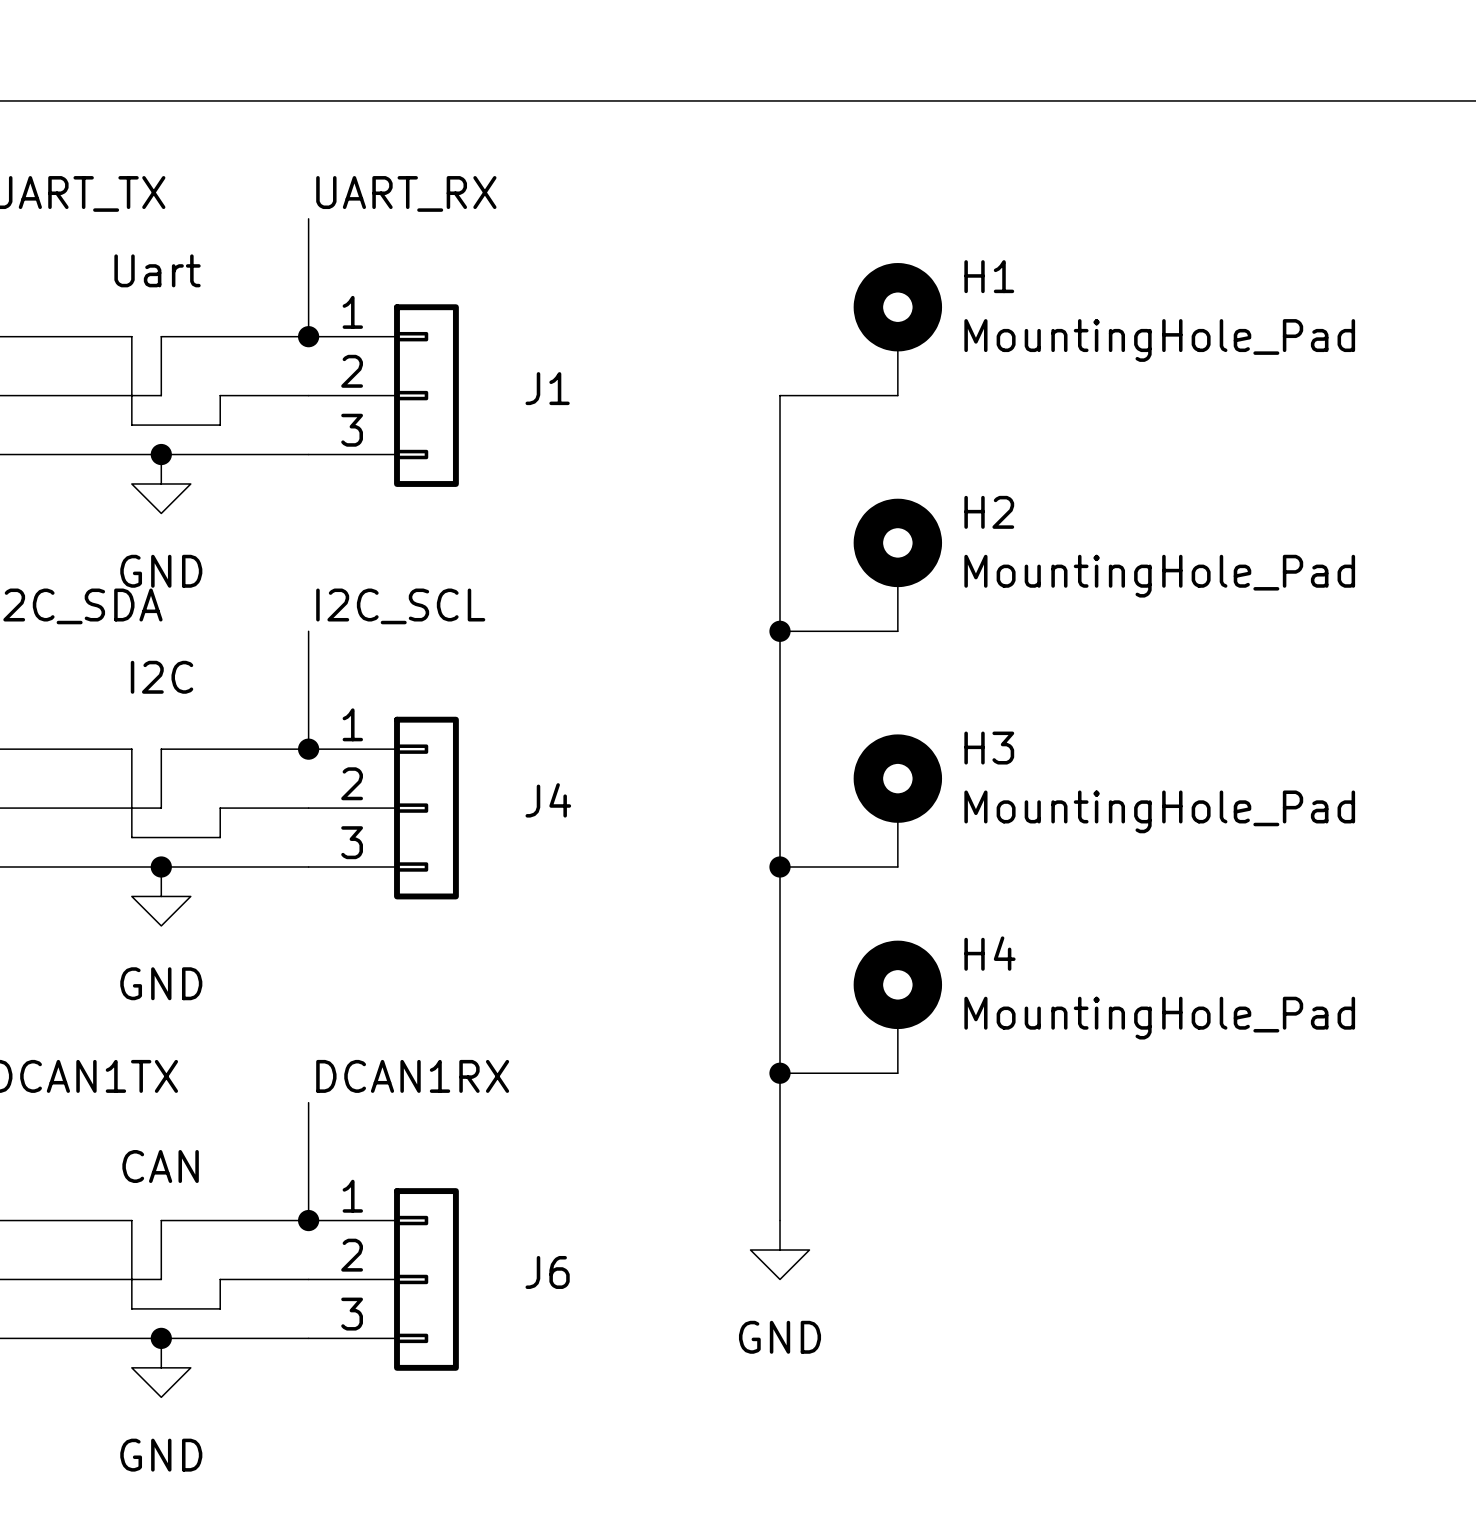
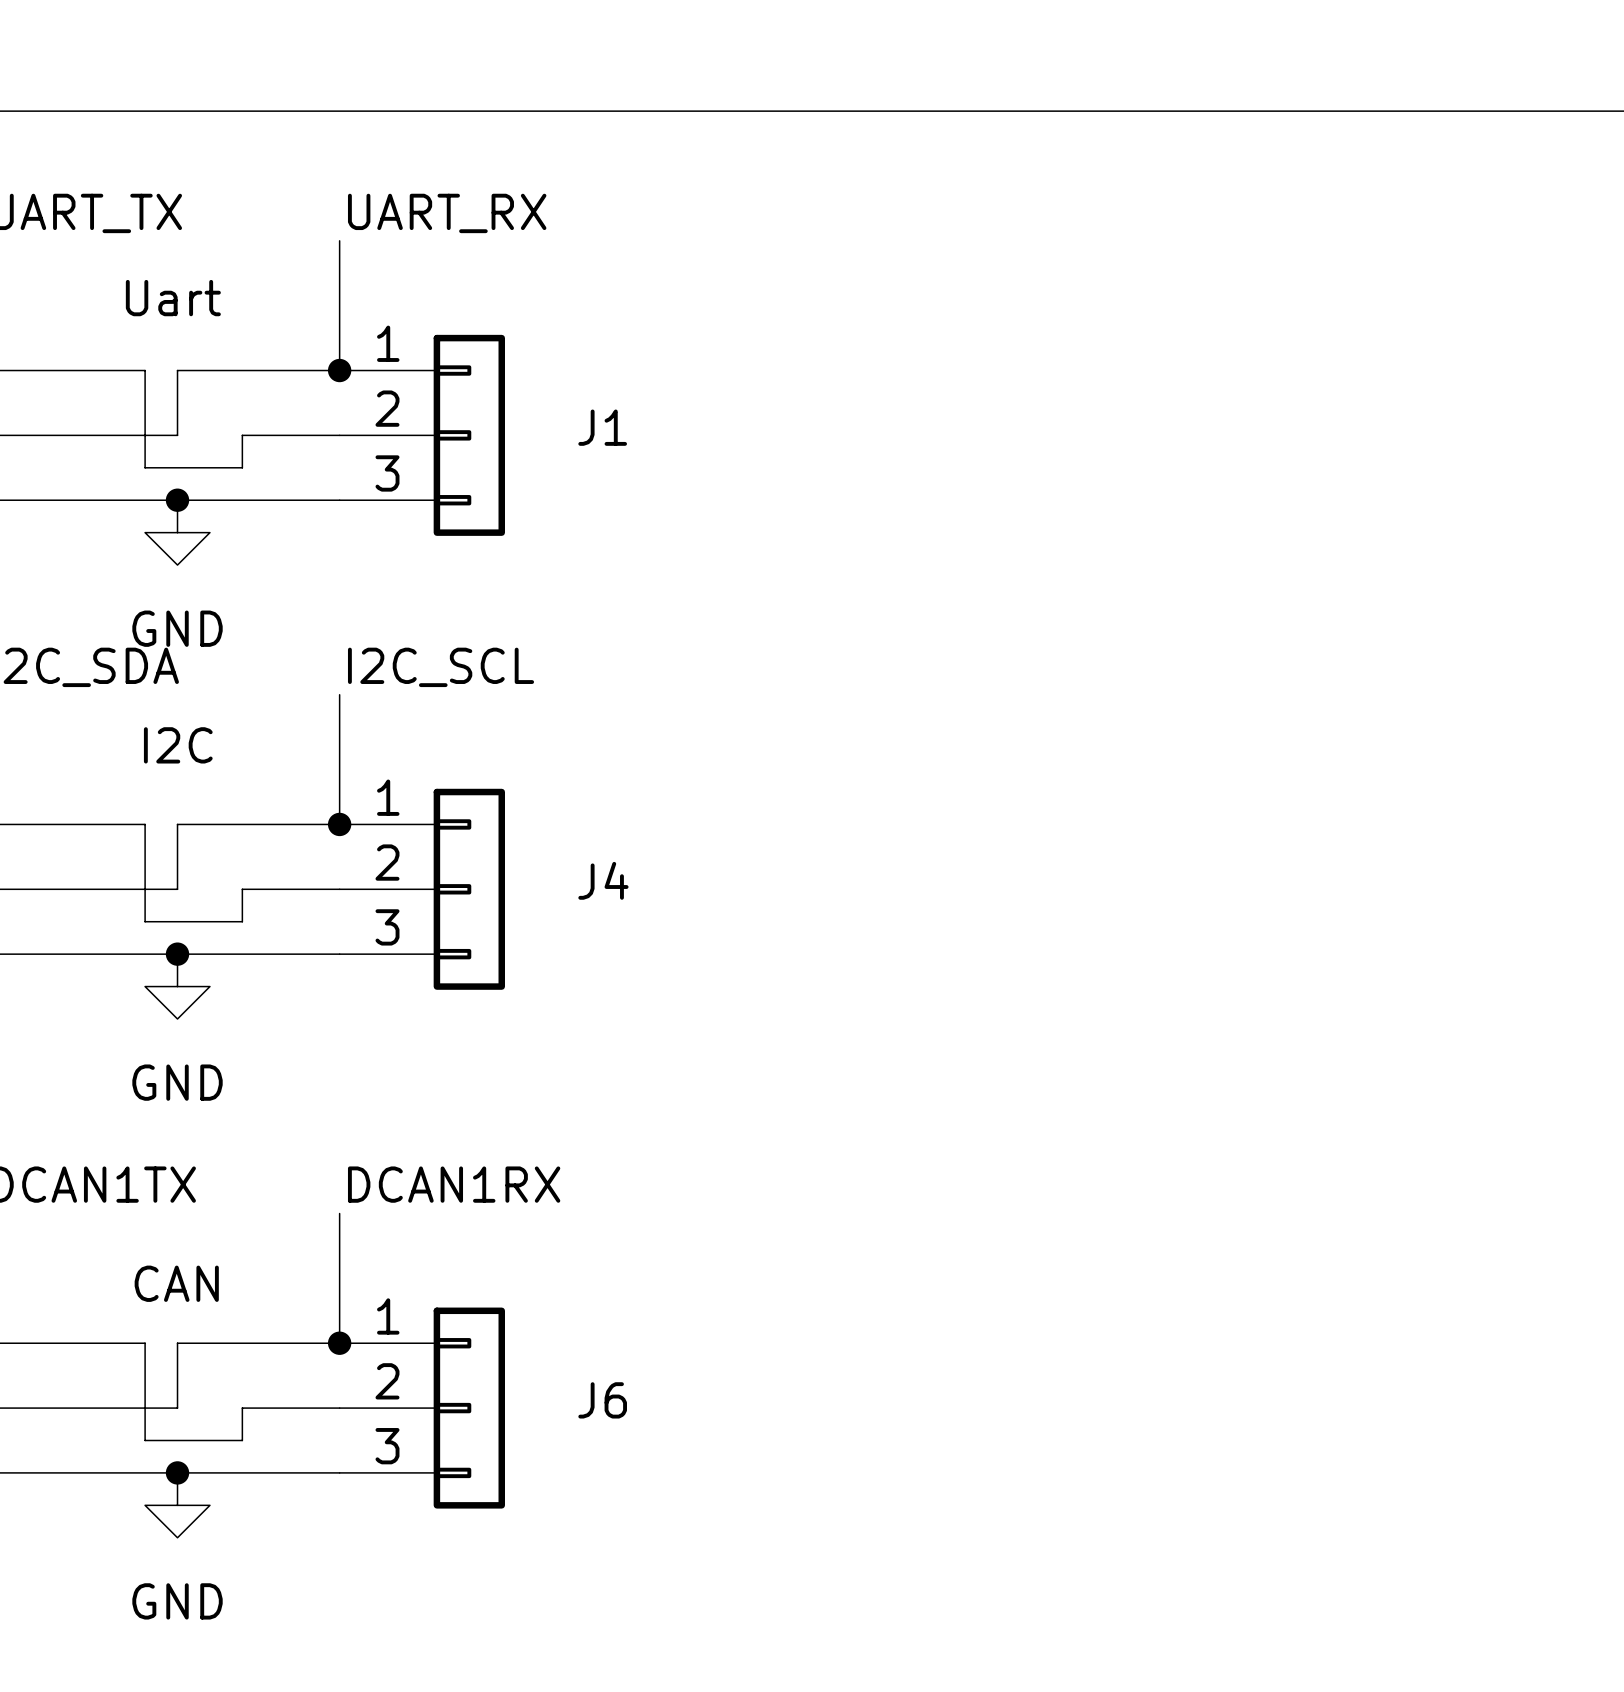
H1: MountingHole_Pad (897, 329) -> none
wire: (897, 395) (780, 395) (780, 1220) -> none
H2: MountingHole_Pad (897, 565) -> none
wire: (780, 631) (897, 631) -> none
junction: (780, 631) -> none
H3: MountingHole_Pad (897, 800) -> none
wire: (780, 867) (897, 867) -> none
junction: (780, 867) -> none
H4: MountingHole_Pad (897, 1006) -> none
wire: (780, 1073) (897, 1073) -> none
junction: (780, 1073) -> none
power symbol: GND (780, 1250) -> none

